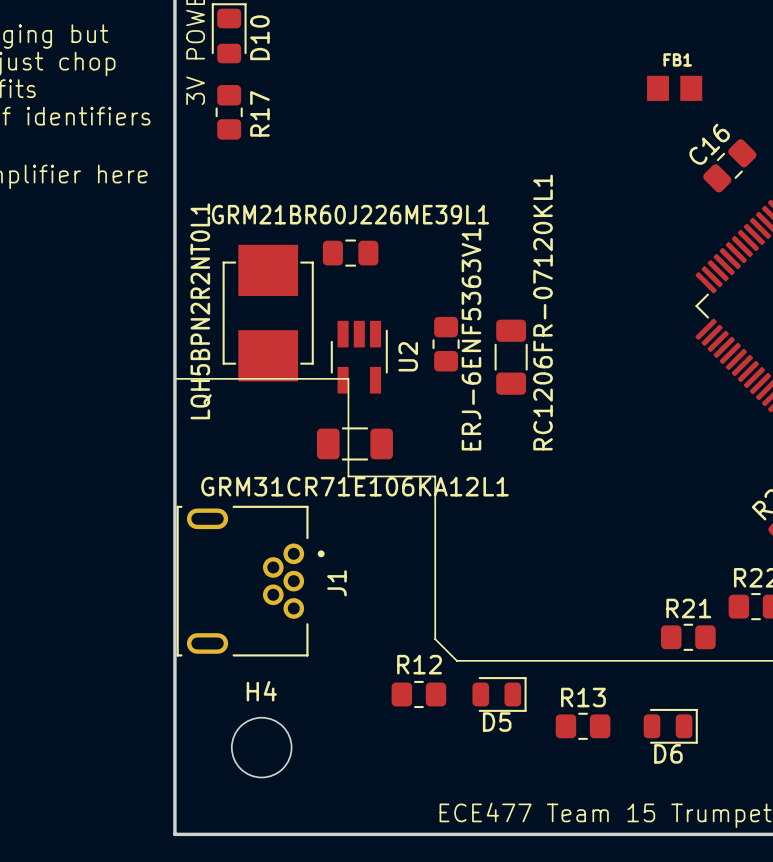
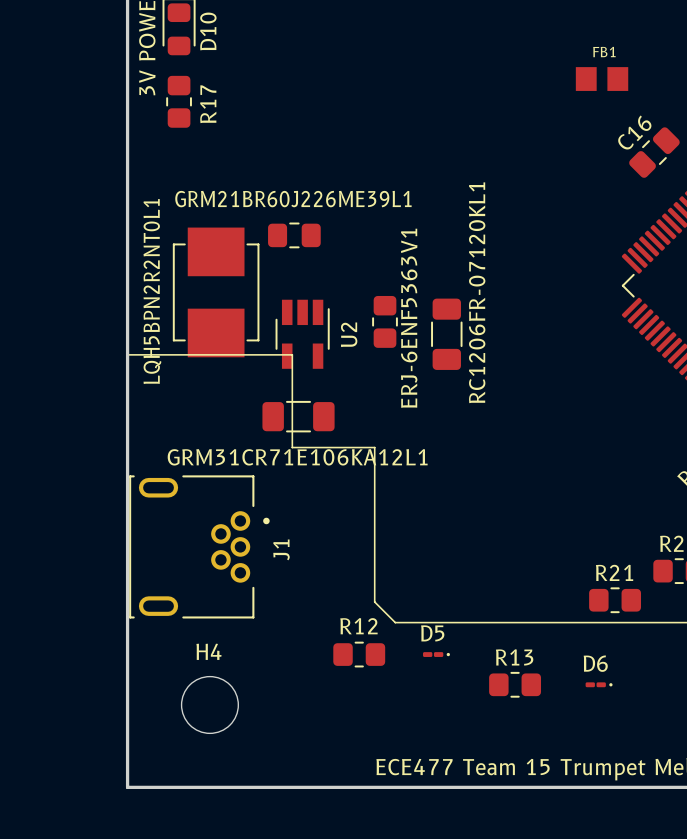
D5 footprint: [472, 677, 527, 712] -> [423, 652, 450, 657]
D6 footprint: [643, 708, 698, 744] -> [585, 682, 613, 688]
D5 name position: D5 (497, 722) -> D5 (432, 633)
D6 name position: D6 (668, 753) -> D6 (595, 663)

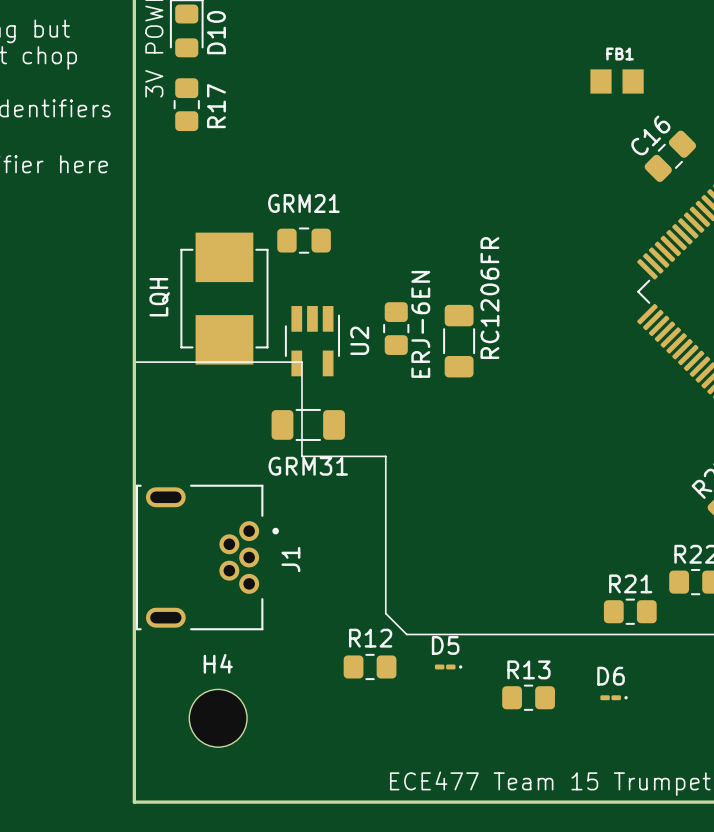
GRM21BR60J226ME39L1 name: GRM21BR60J226ME39L1 (293, 199) -> GRM21 (303, 203)
LQH5BPN2R2NT0L1 name: LQH5BPN2R2NT0L1 (152, 291) -> LQH (159, 297)
RC1206FR-07120KL1 name: RC1206FR-07120KL1 (477, 292) -> RC1206FR (489, 298)
ERJ-6ENF5363V1 name: ERJ-6ENF5363V1 (409, 318) -> ERJ-6EN (420, 324)
GRM31CR71E106KA12L1 name: GRM31CR71E106KA12L1 (297, 457) -> GRM31 (308, 466)

